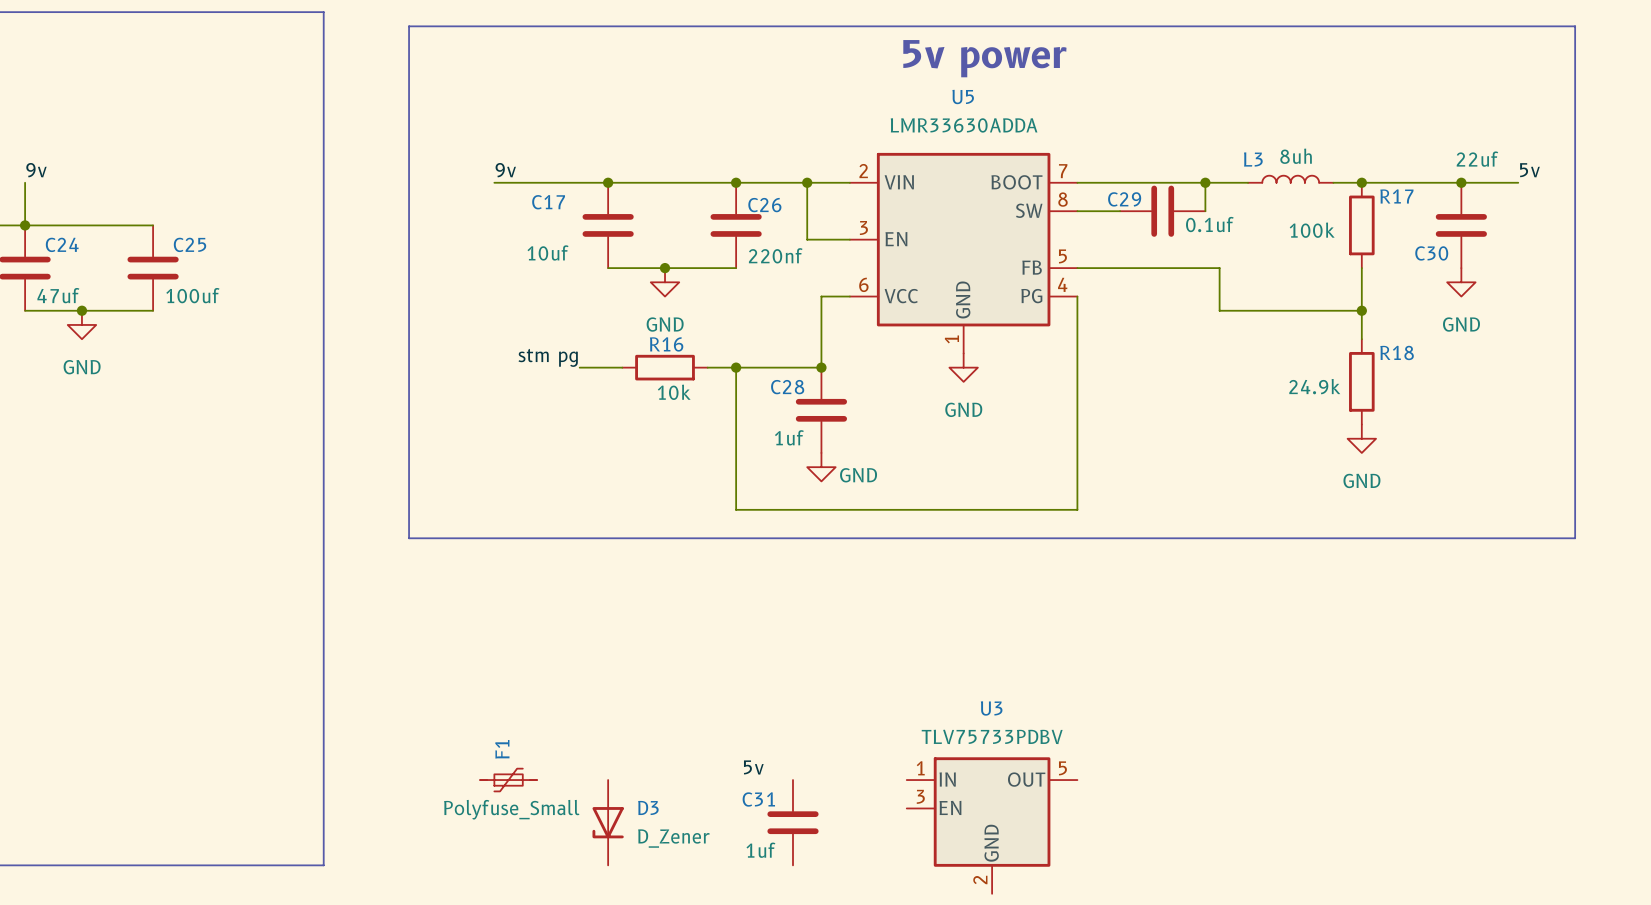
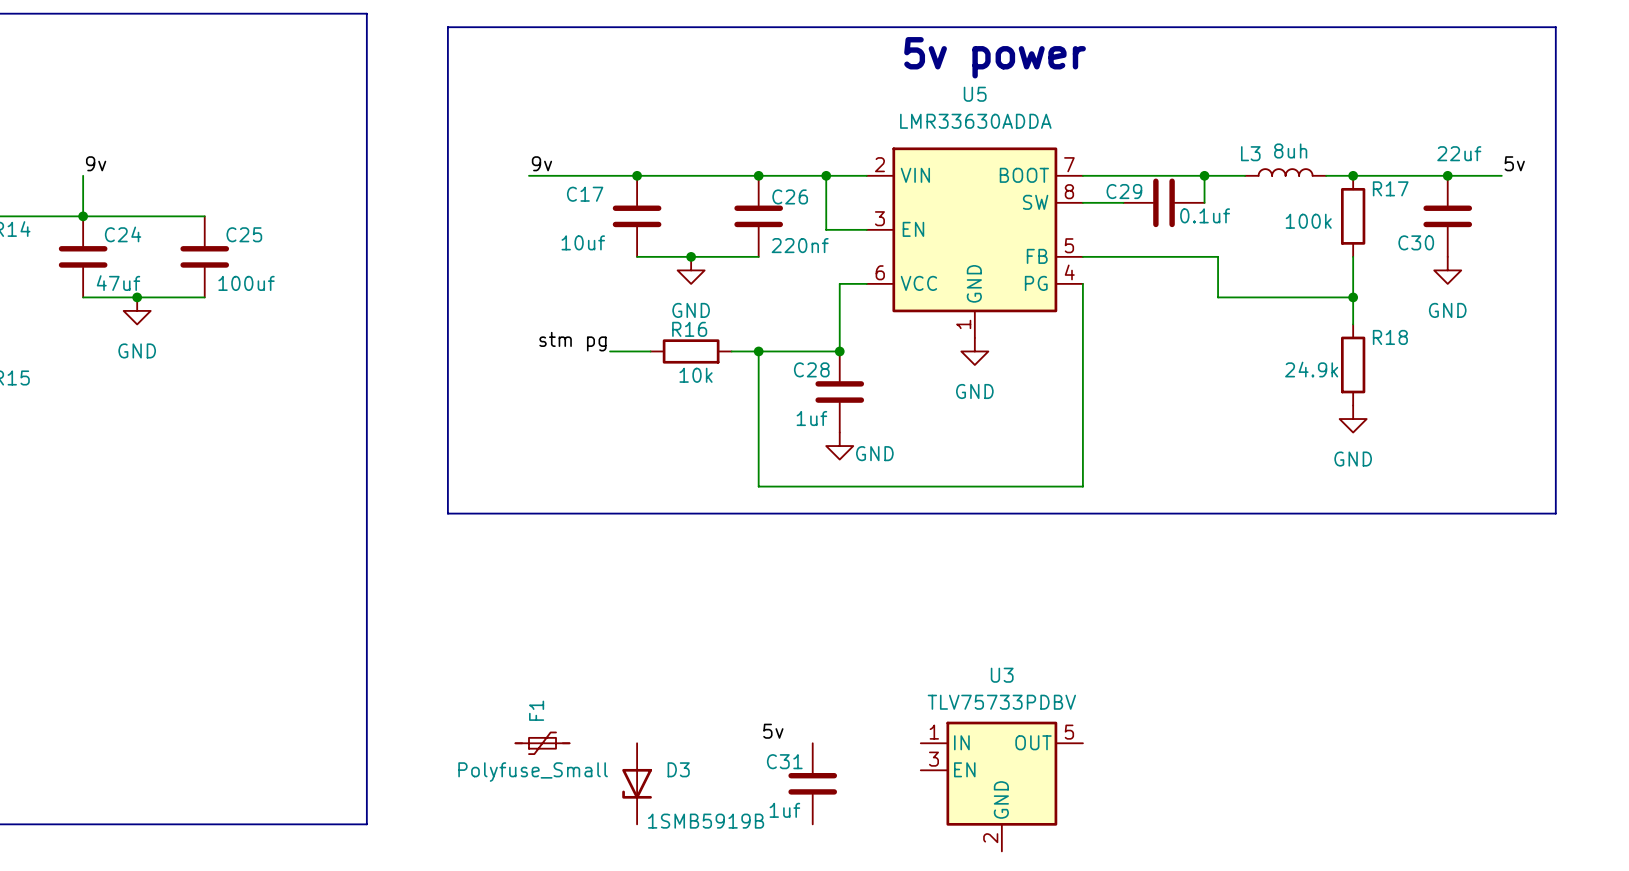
D3 value: D_Zener (673, 838) -> 1SMB5919B (706, 821)

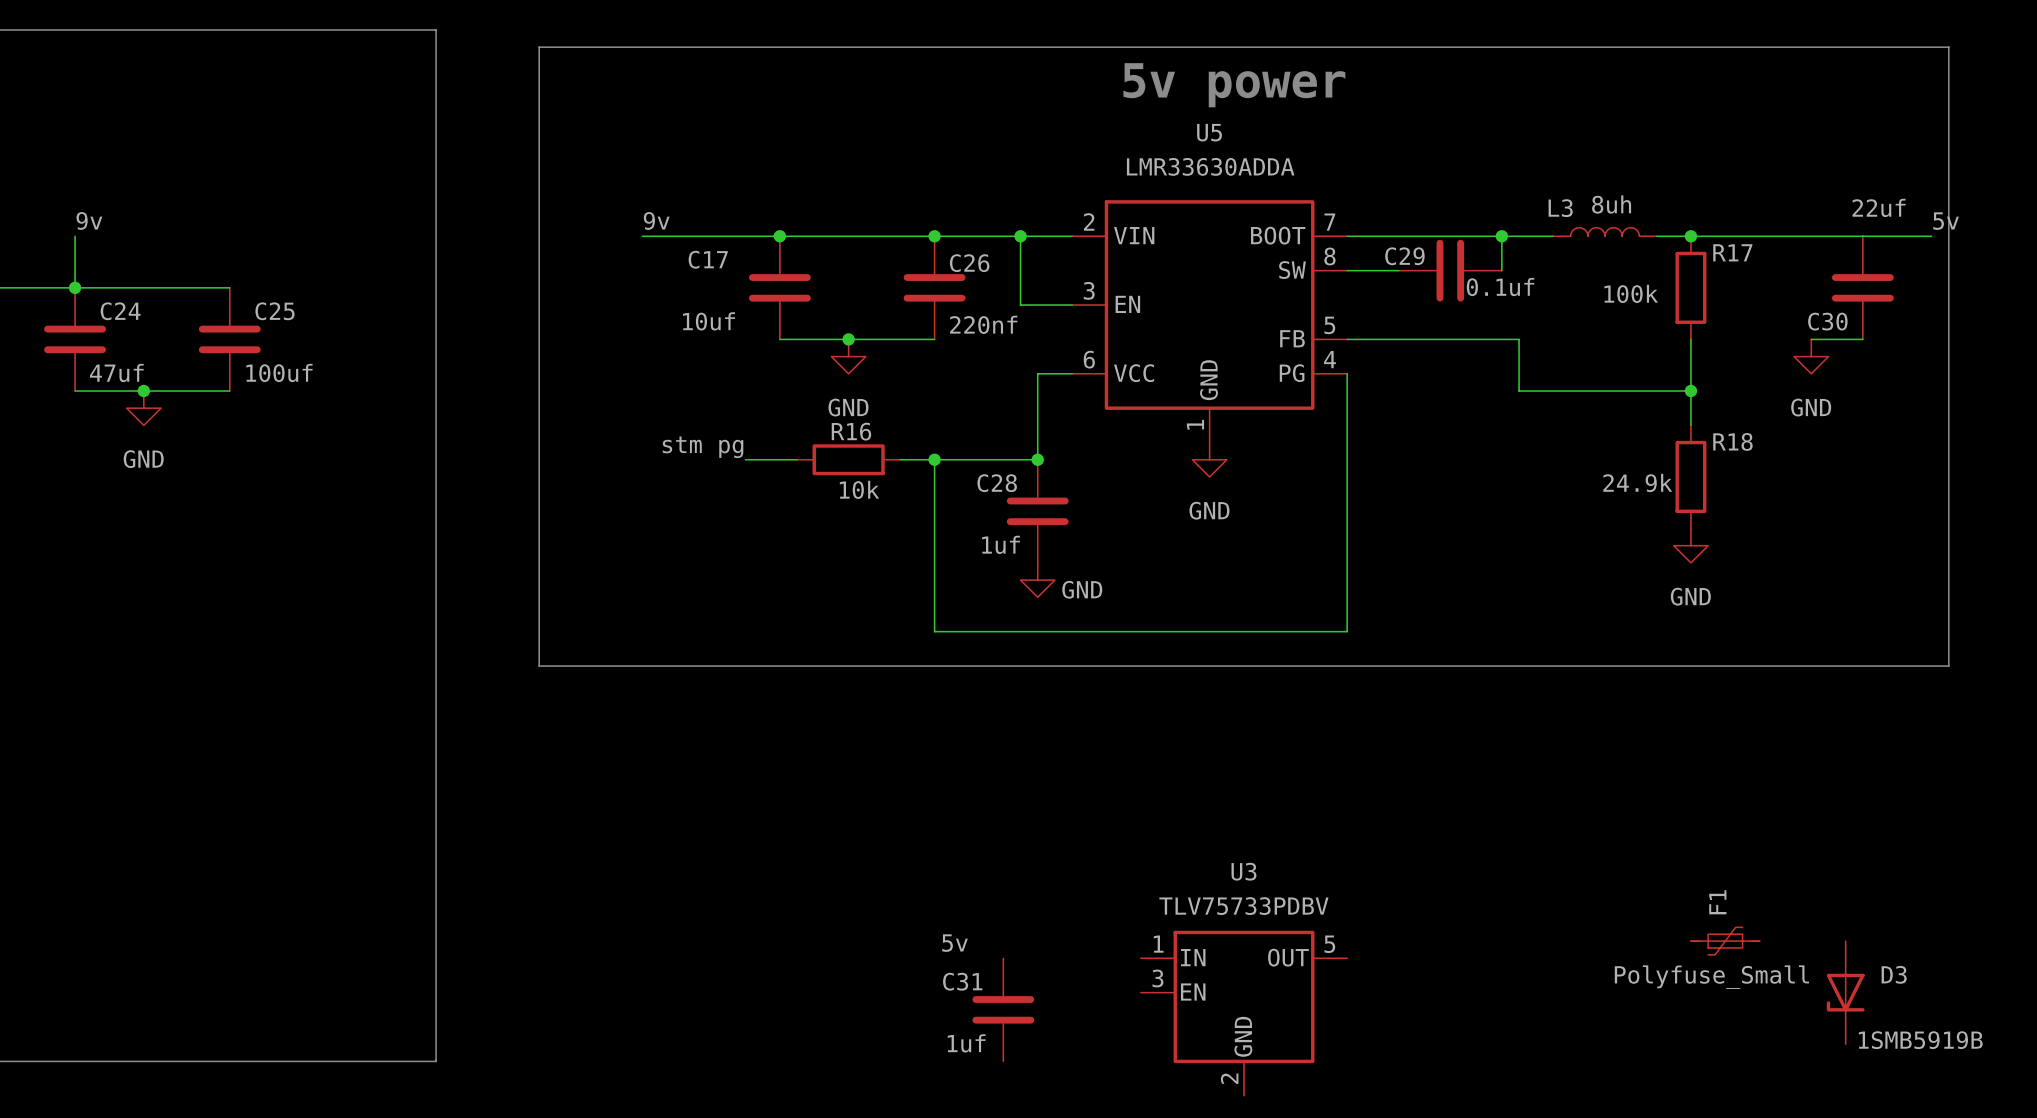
label position: 5v (1514, 163) -> 5v (1946, 221)
junction: (1447, 175) -> none
wire: none -> (1880, 236) (1931, 236)
C30 position: (1447, 216) -> (1862, 287)
wire: none -> (1811, 339) (1862, 339)
F1 position: (542, 743) -> (1725, 941)
D3 position: (637, 783) -> (1845, 992)

